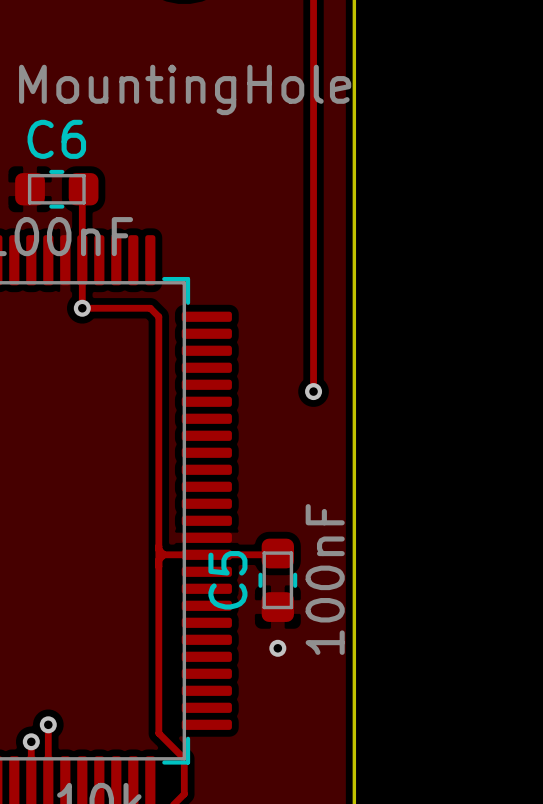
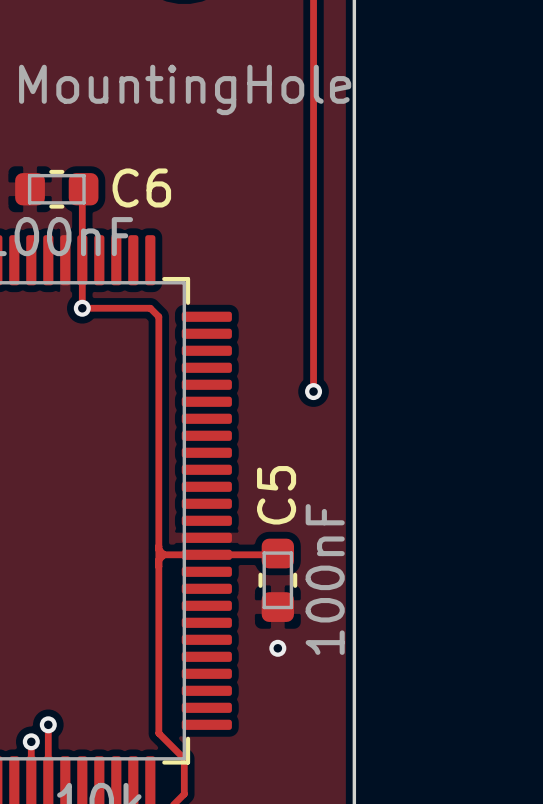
C6 name position: C6 (56, 139) -> C6 (141, 187)
C5 name position: C5 (227, 580) -> C5 (276, 495)

